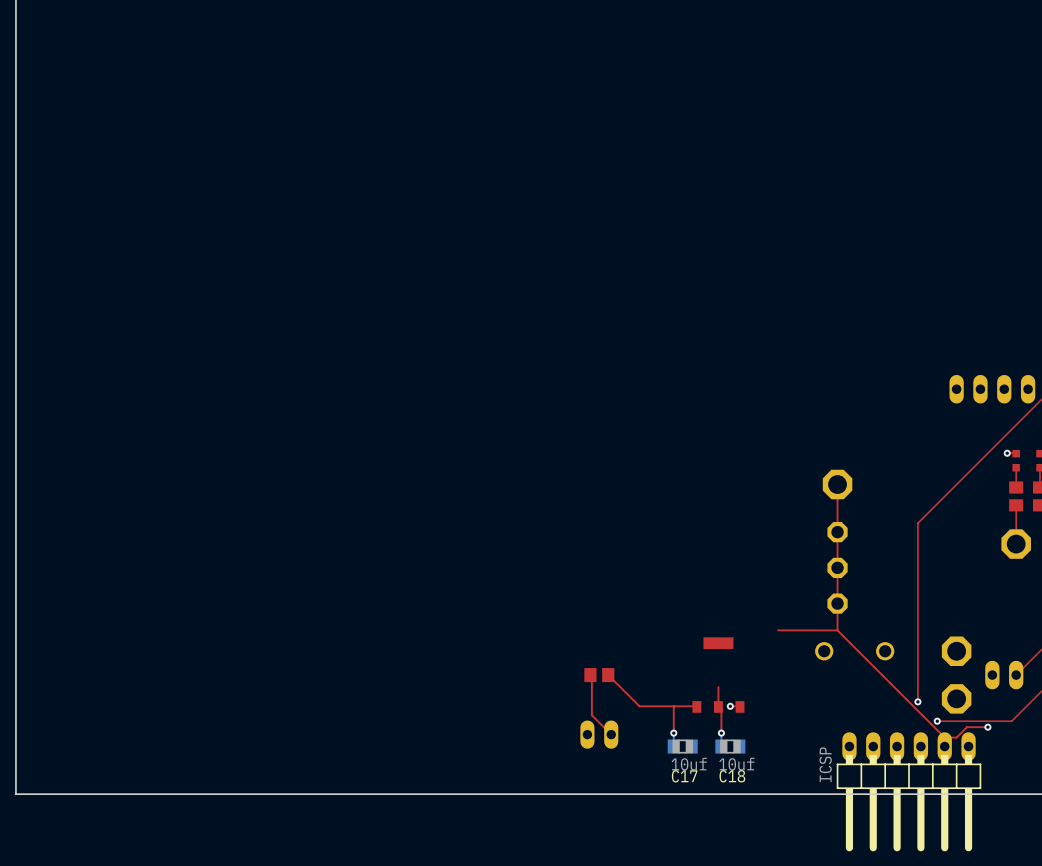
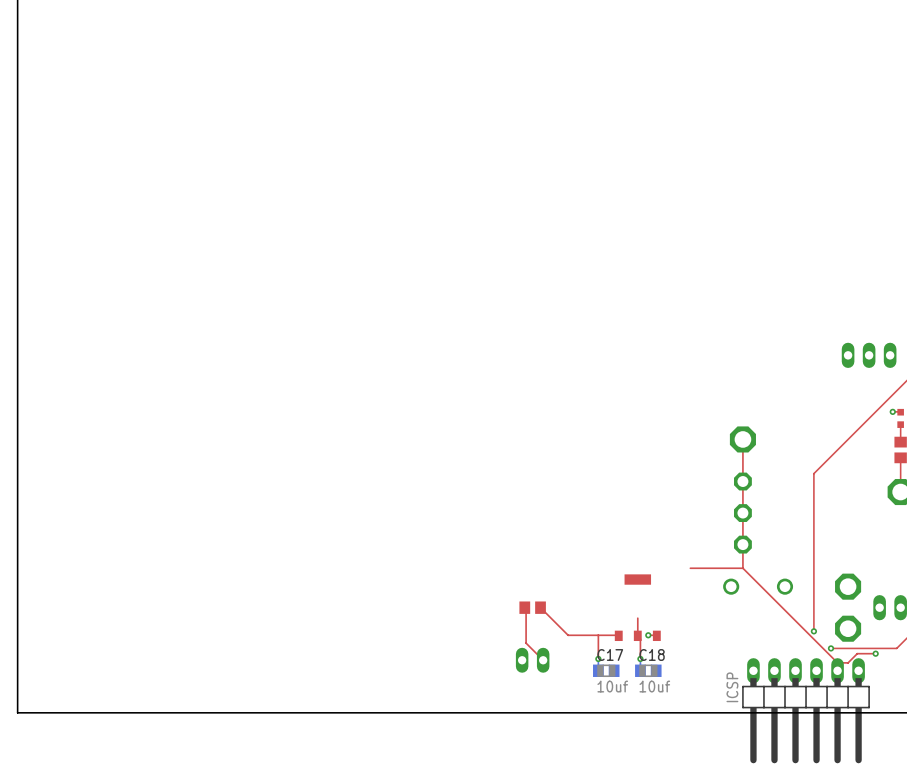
C17 name position: C17 (684, 776) -> C17 (610, 655)
C18 name position: C18 (732, 776) -> C18 (652, 655)

